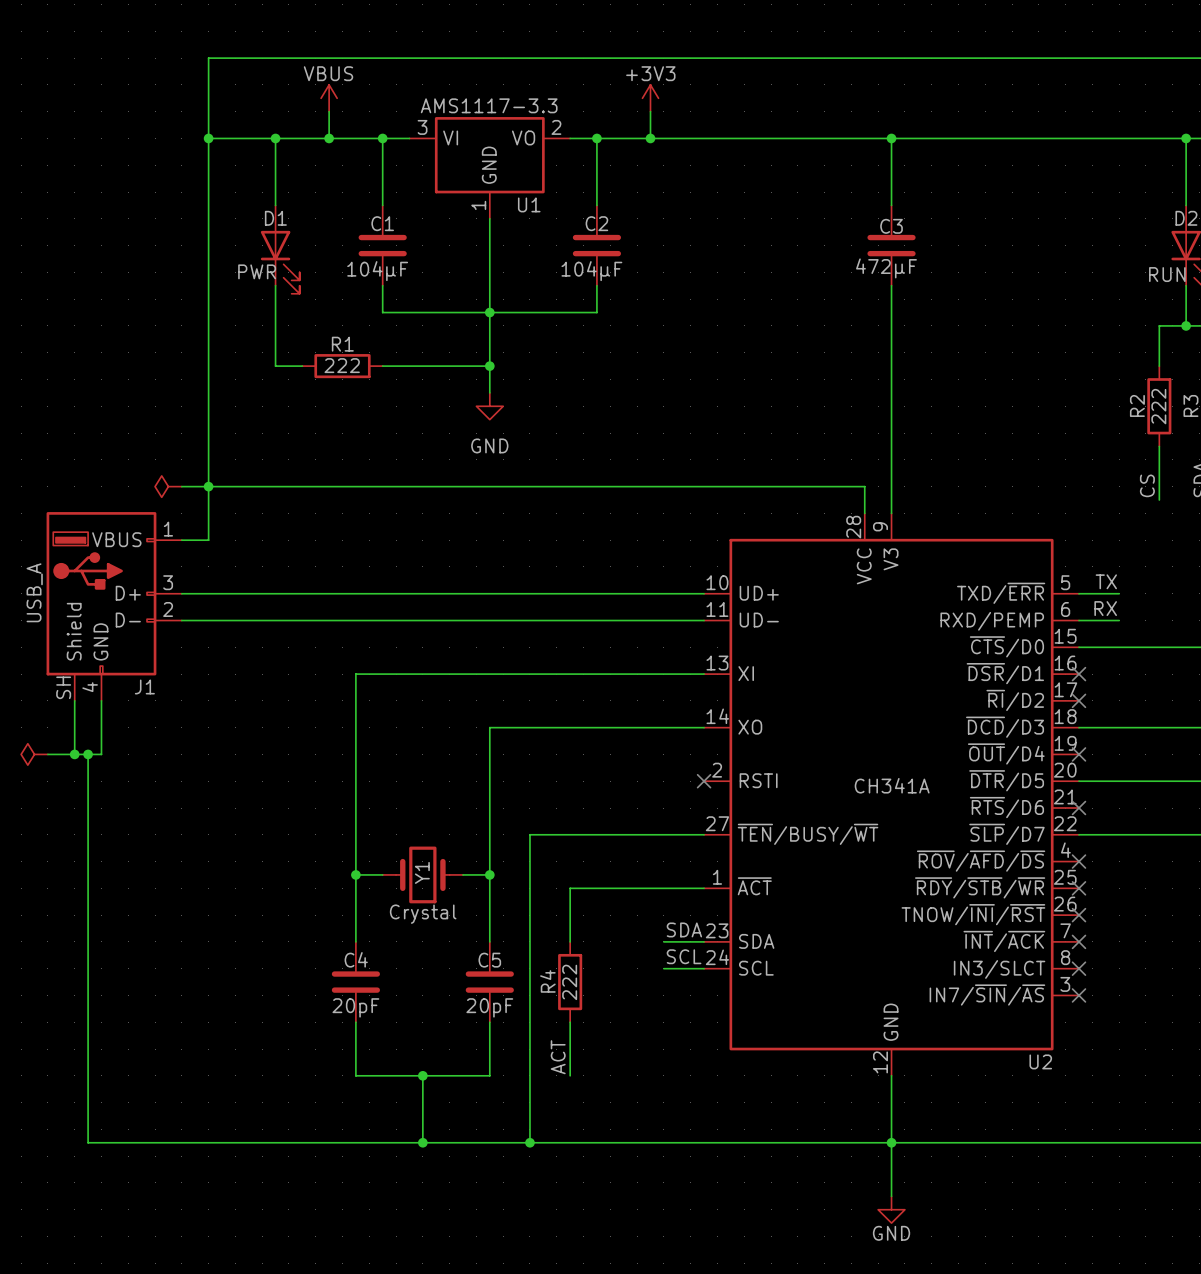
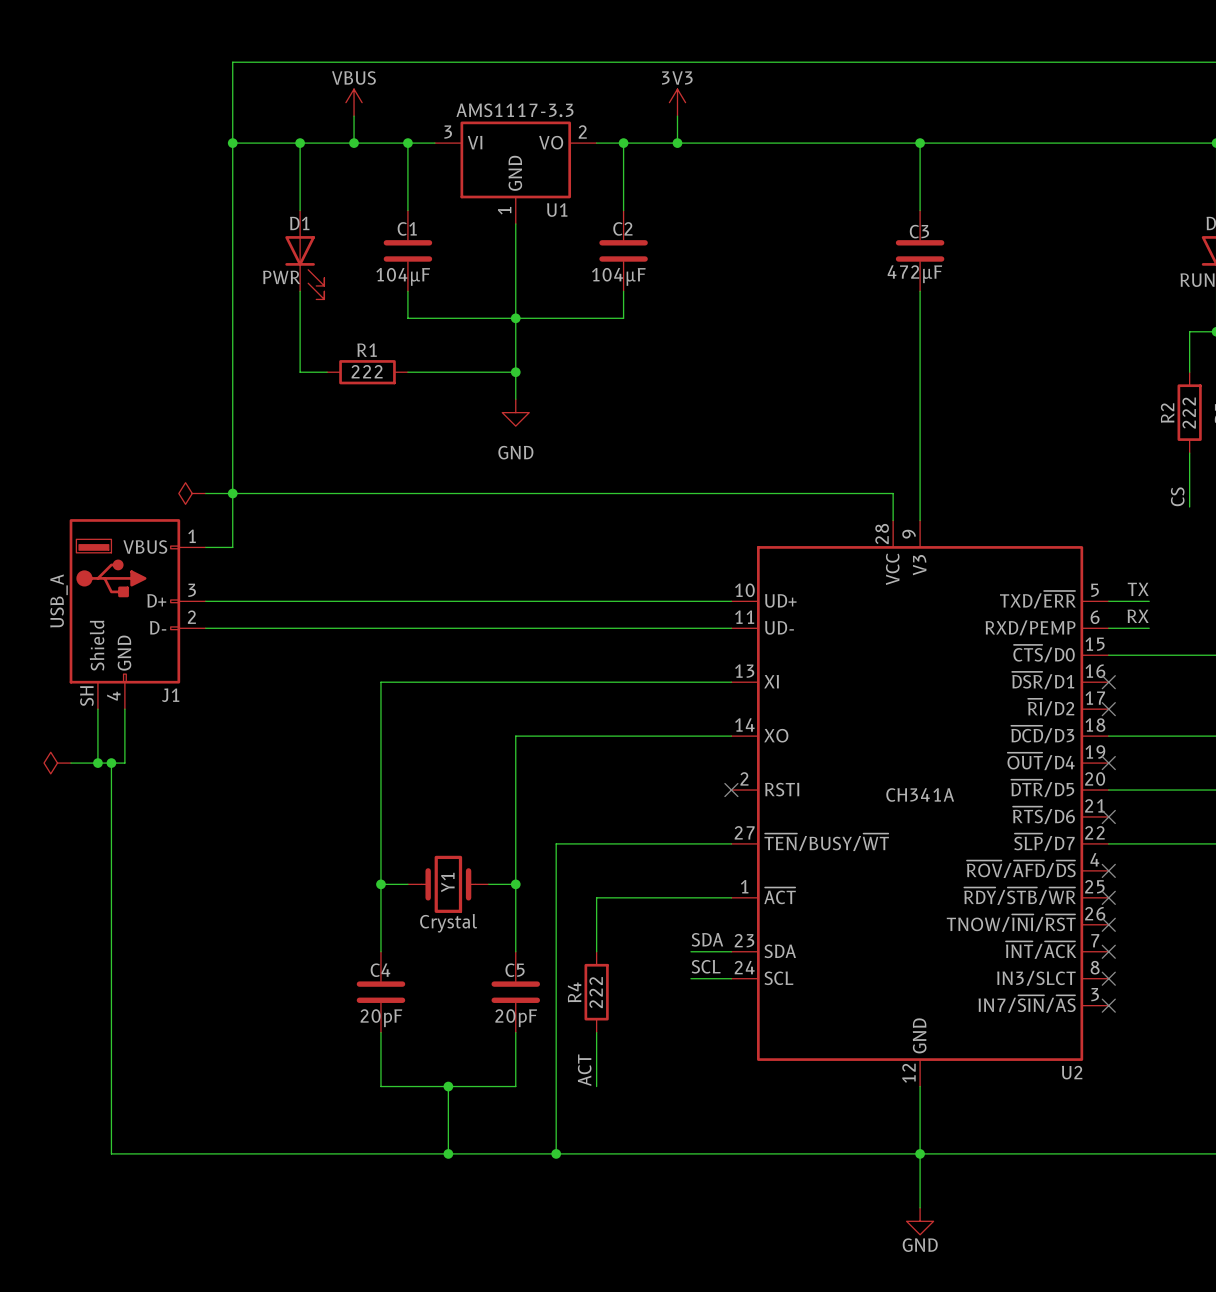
power symbol: +3V3 (650, 98) -> 3V3 (677, 102)

